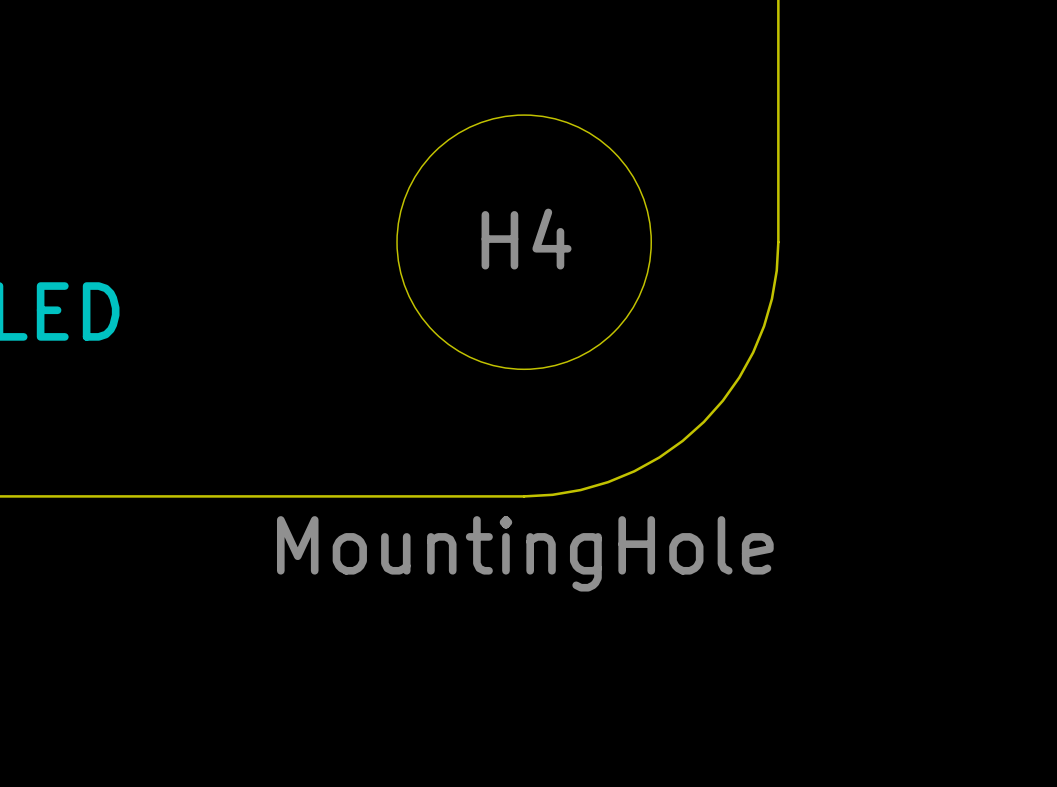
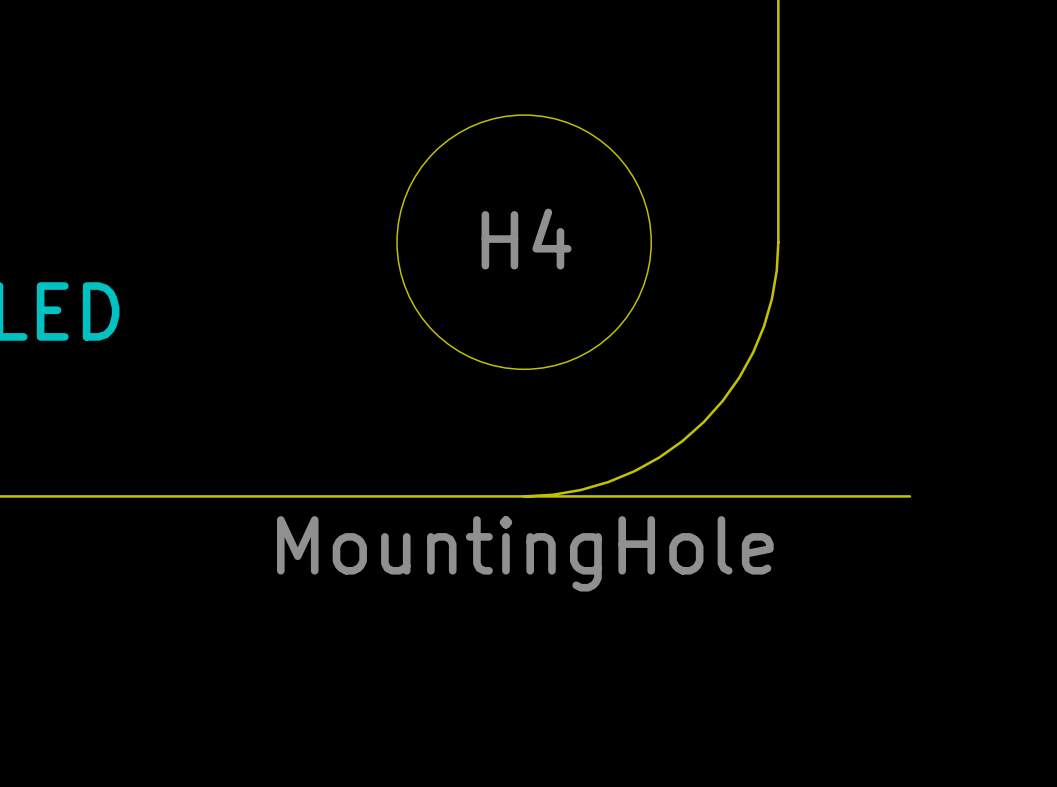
board edge: none -> (524, 496) (909, 496)

